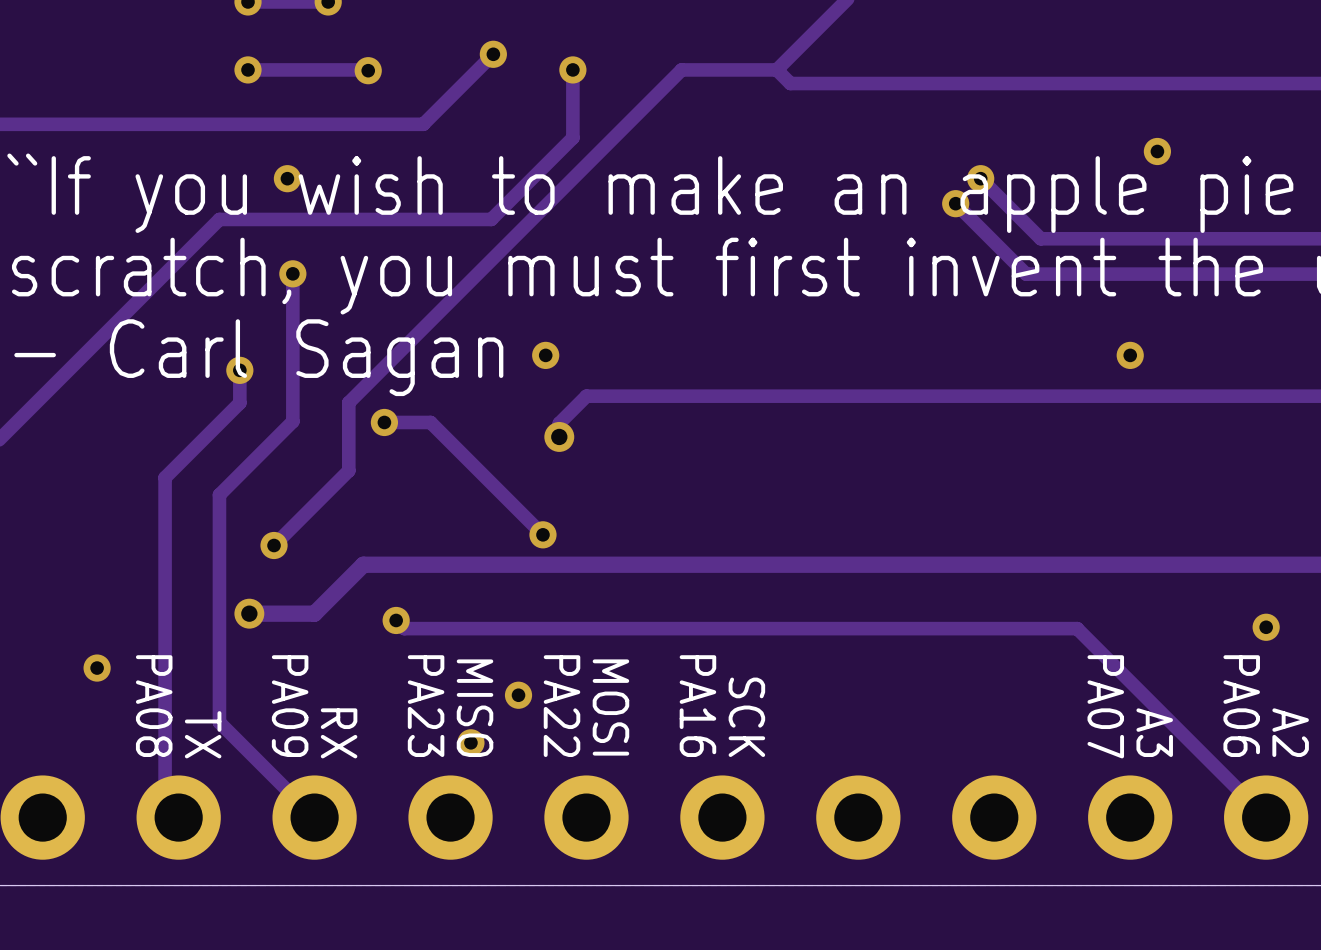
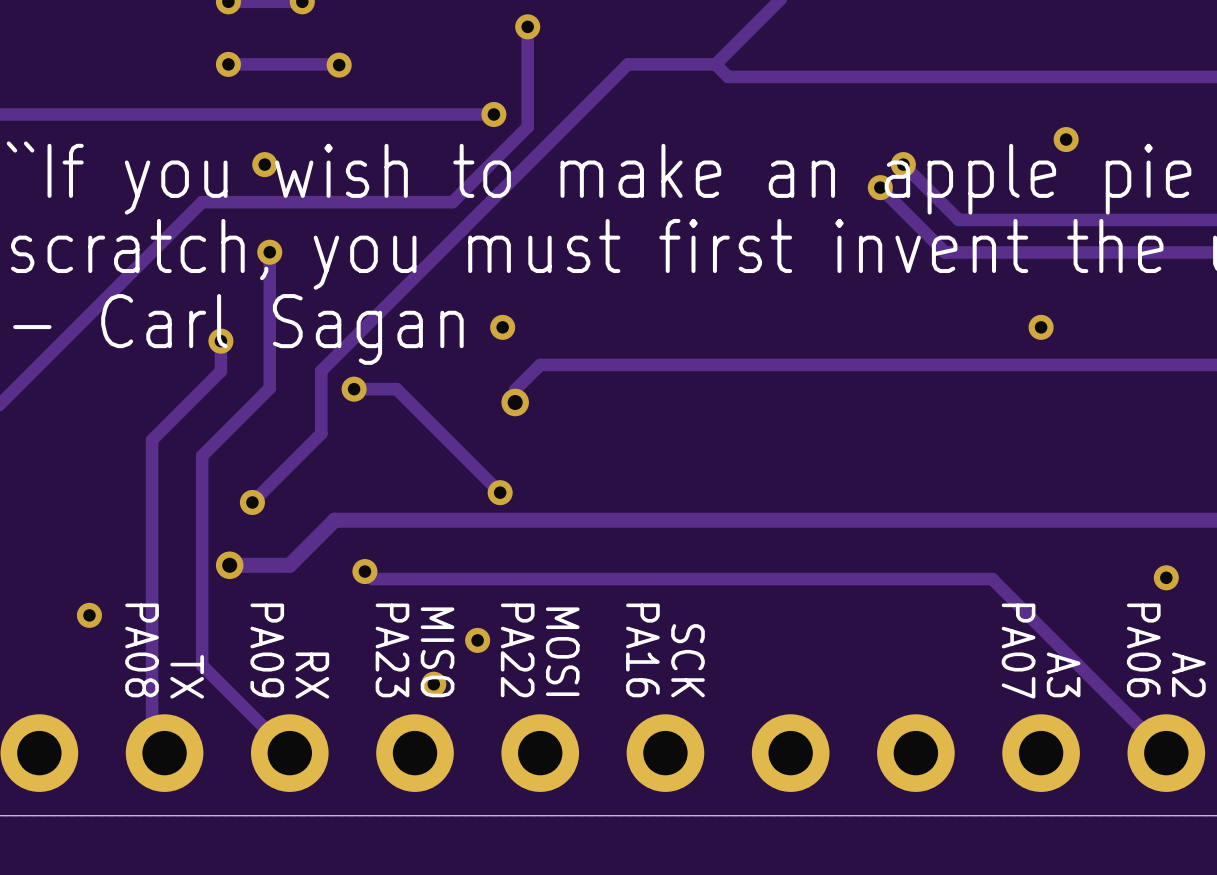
track: none -> (527, 26) (527, 64)
via: none -> (527, 26)
track: (493, 54) (423, 124) -> (493, 114) (389, 114)
via: (493, 54) -> none
via: (572, 69) -> none
via: none -> (493, 114)

